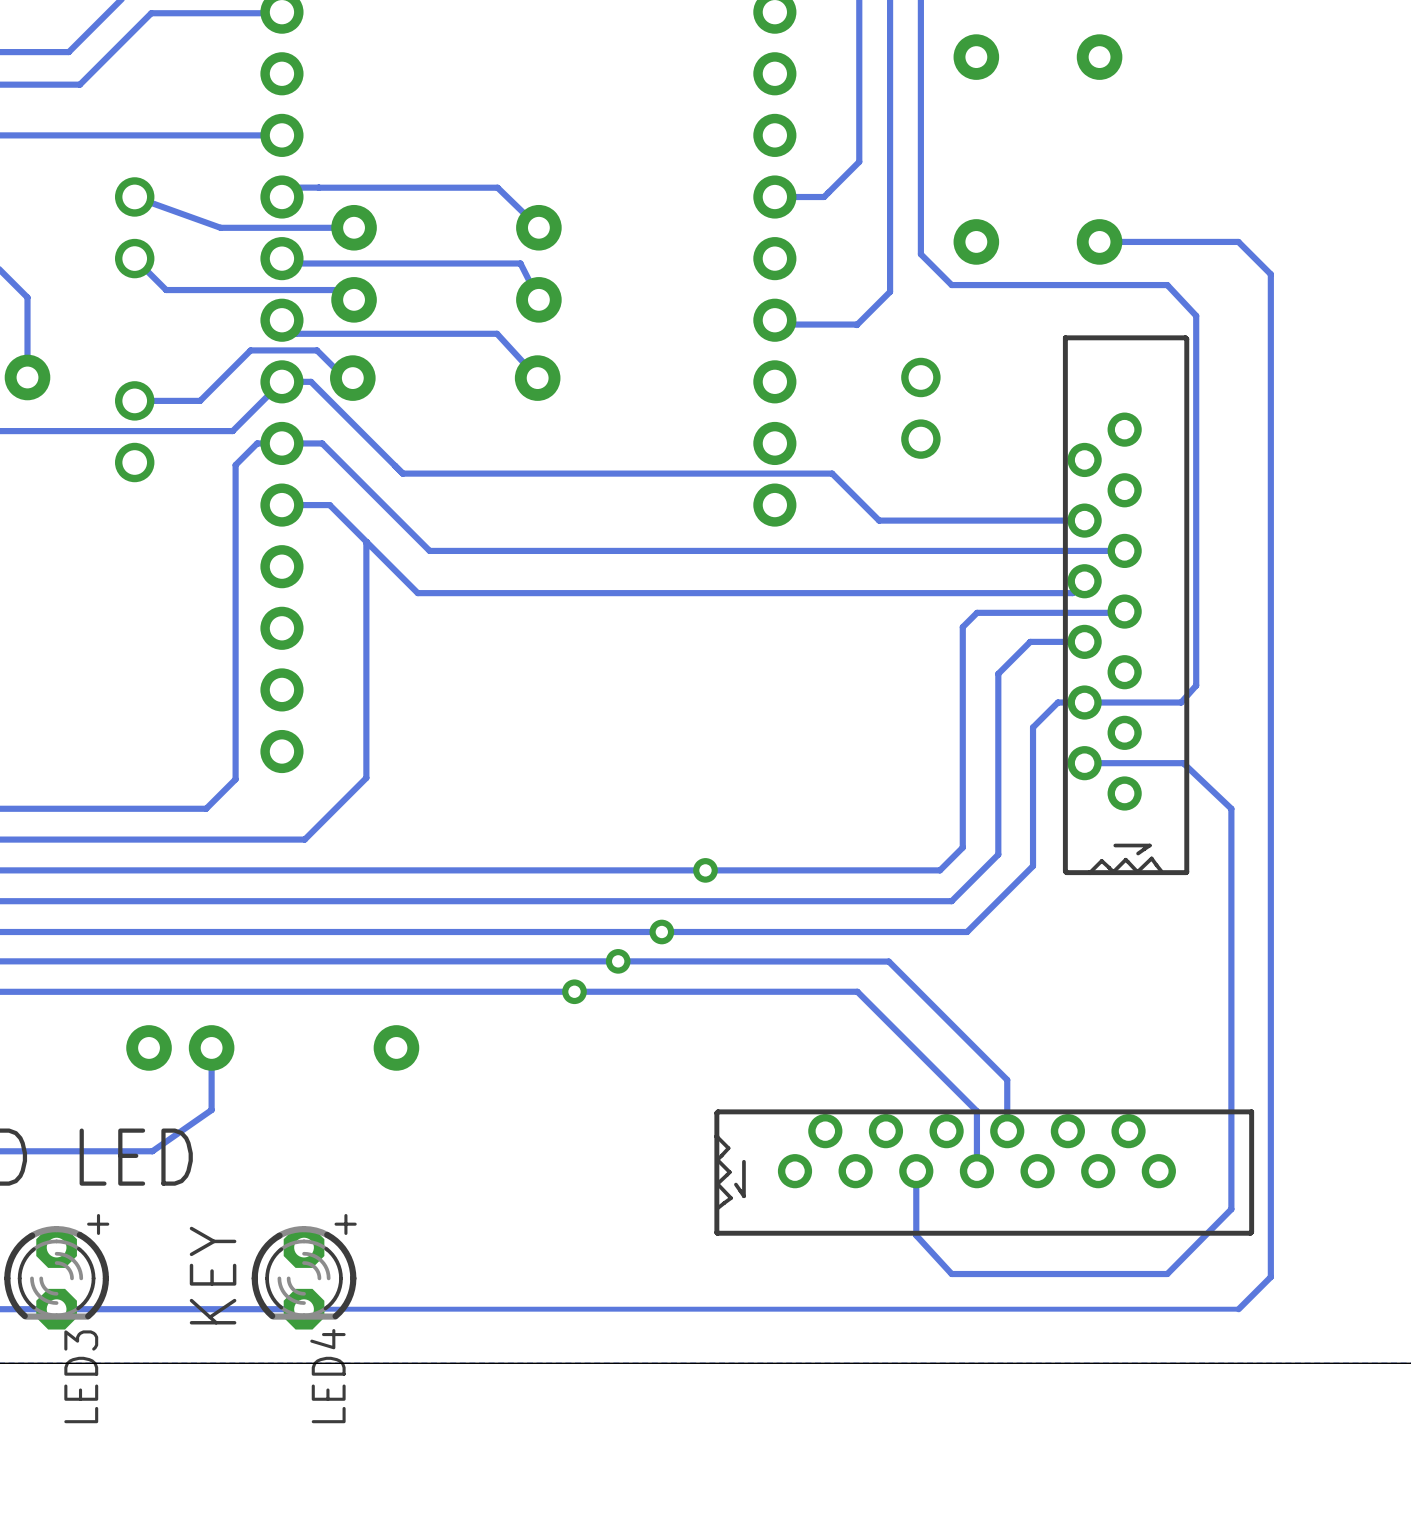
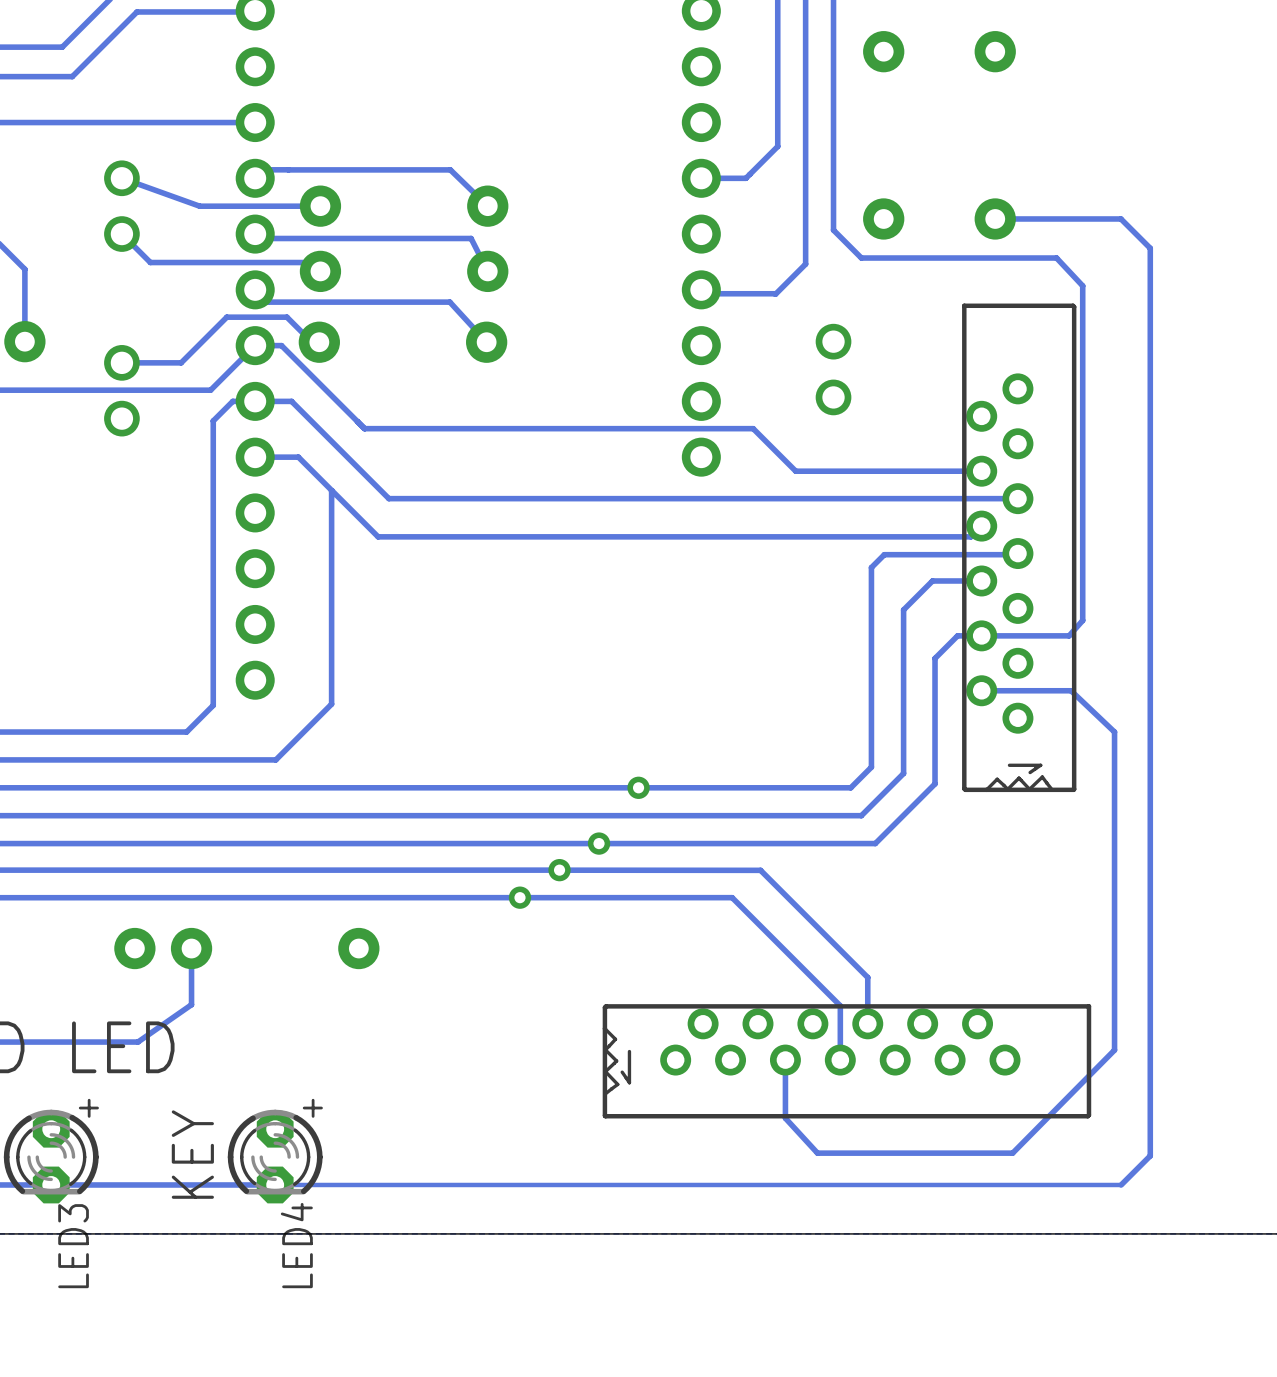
track: (840, 961) (888, 961) (1007, 1079) (1007, 1131) -> (760, 870) (867, 977) (867, 1023)
track: (808, 991) (857, 991) (976, 1111) (976, 1171) -> (732, 897) (840, 1005) (840, 1060)
line: (718, 1111) (717, 1233) -> (649, 1006) (604, 1007) (604, 1115) (649, 1116)
line: (1203, 1111) (1251, 1111) (1251, 1232) (1201, 1233) -> (1088, 1006) (1087, 1116)
line: (716, 1136) (728, 1148) (717, 1159) (729, 1172) (717, 1183) (731, 1198) (718, 1207) -> (604, 1028) (615, 1039) (605, 1049) (616, 1061) (605, 1071) (617, 1084) (606, 1093)
part position: (976, 1151) -> (840, 1041)
track: (1231, 1160) (1231, 1209) (1167, 1274) (1118, 1274) -> (1114, 1050) (1012, 1153)
line: (743, 1161) (743, 1196) (735, 1184) -> (629, 1051) (629, 1082) (622, 1072)
track: (916, 1171) (916, 1235) (951, 1274) -> (785, 1060) (785, 1118) (817, 1153) (861, 1153)

